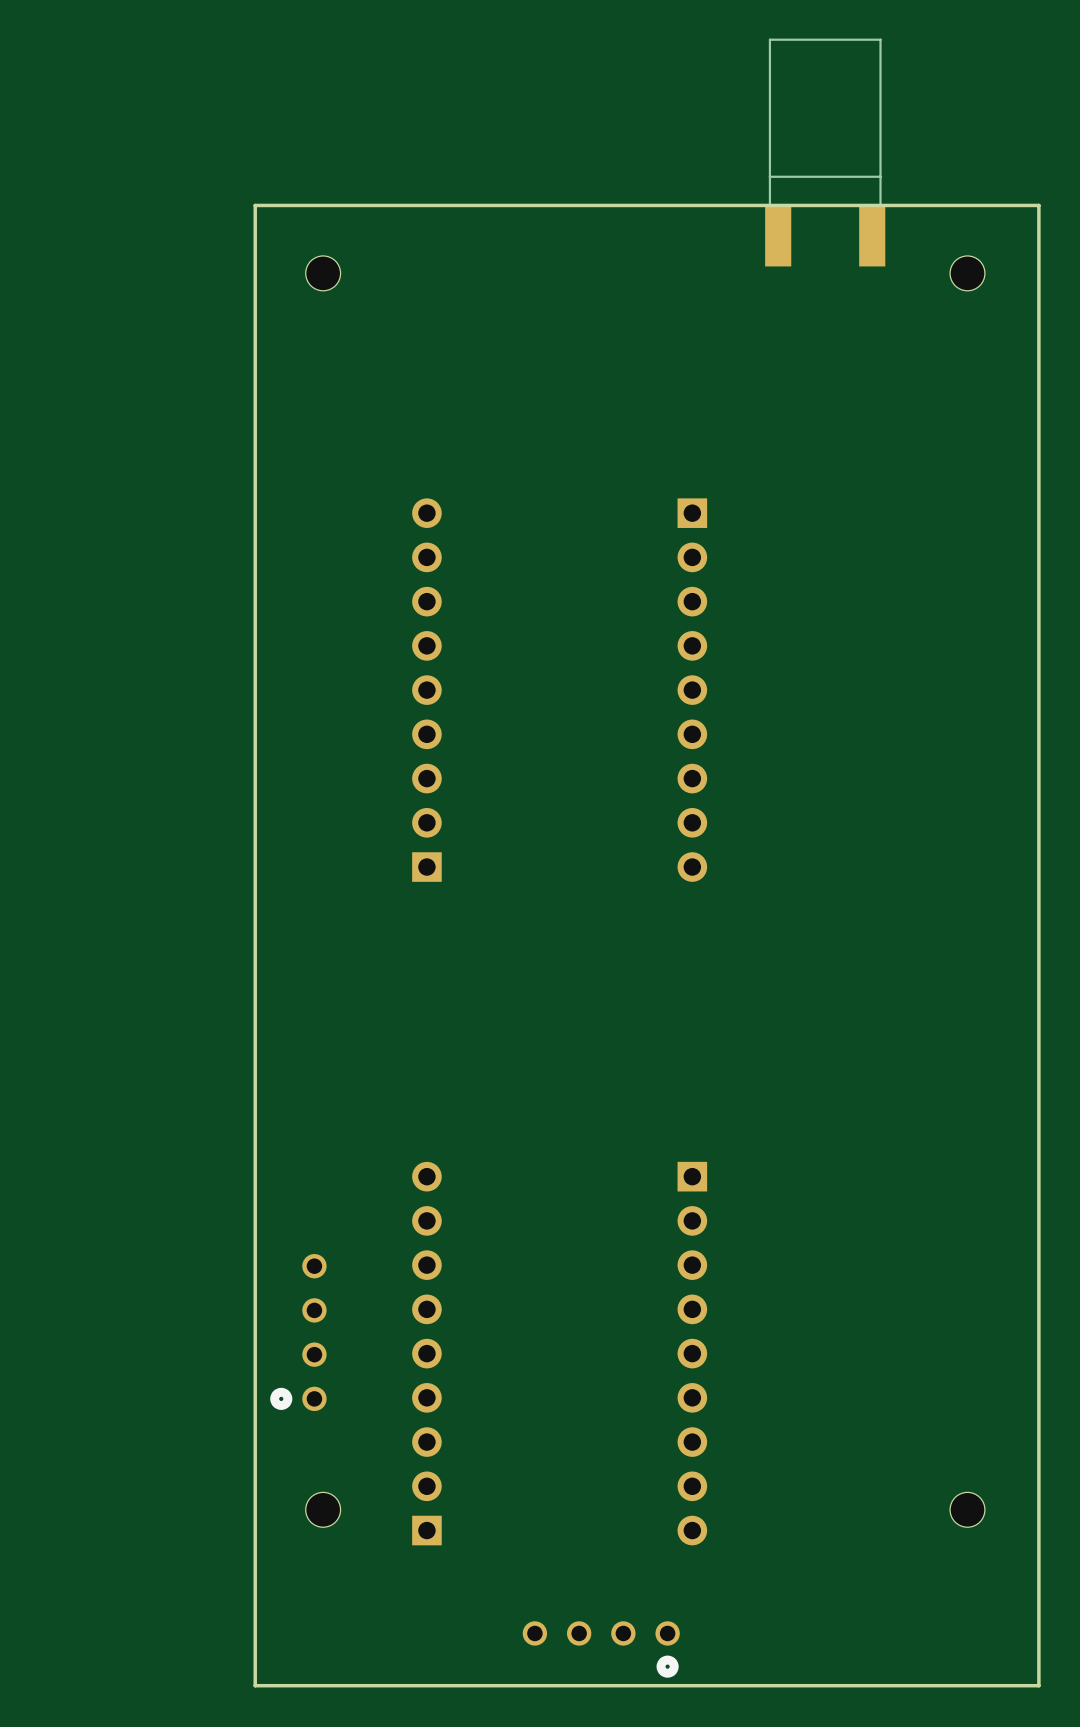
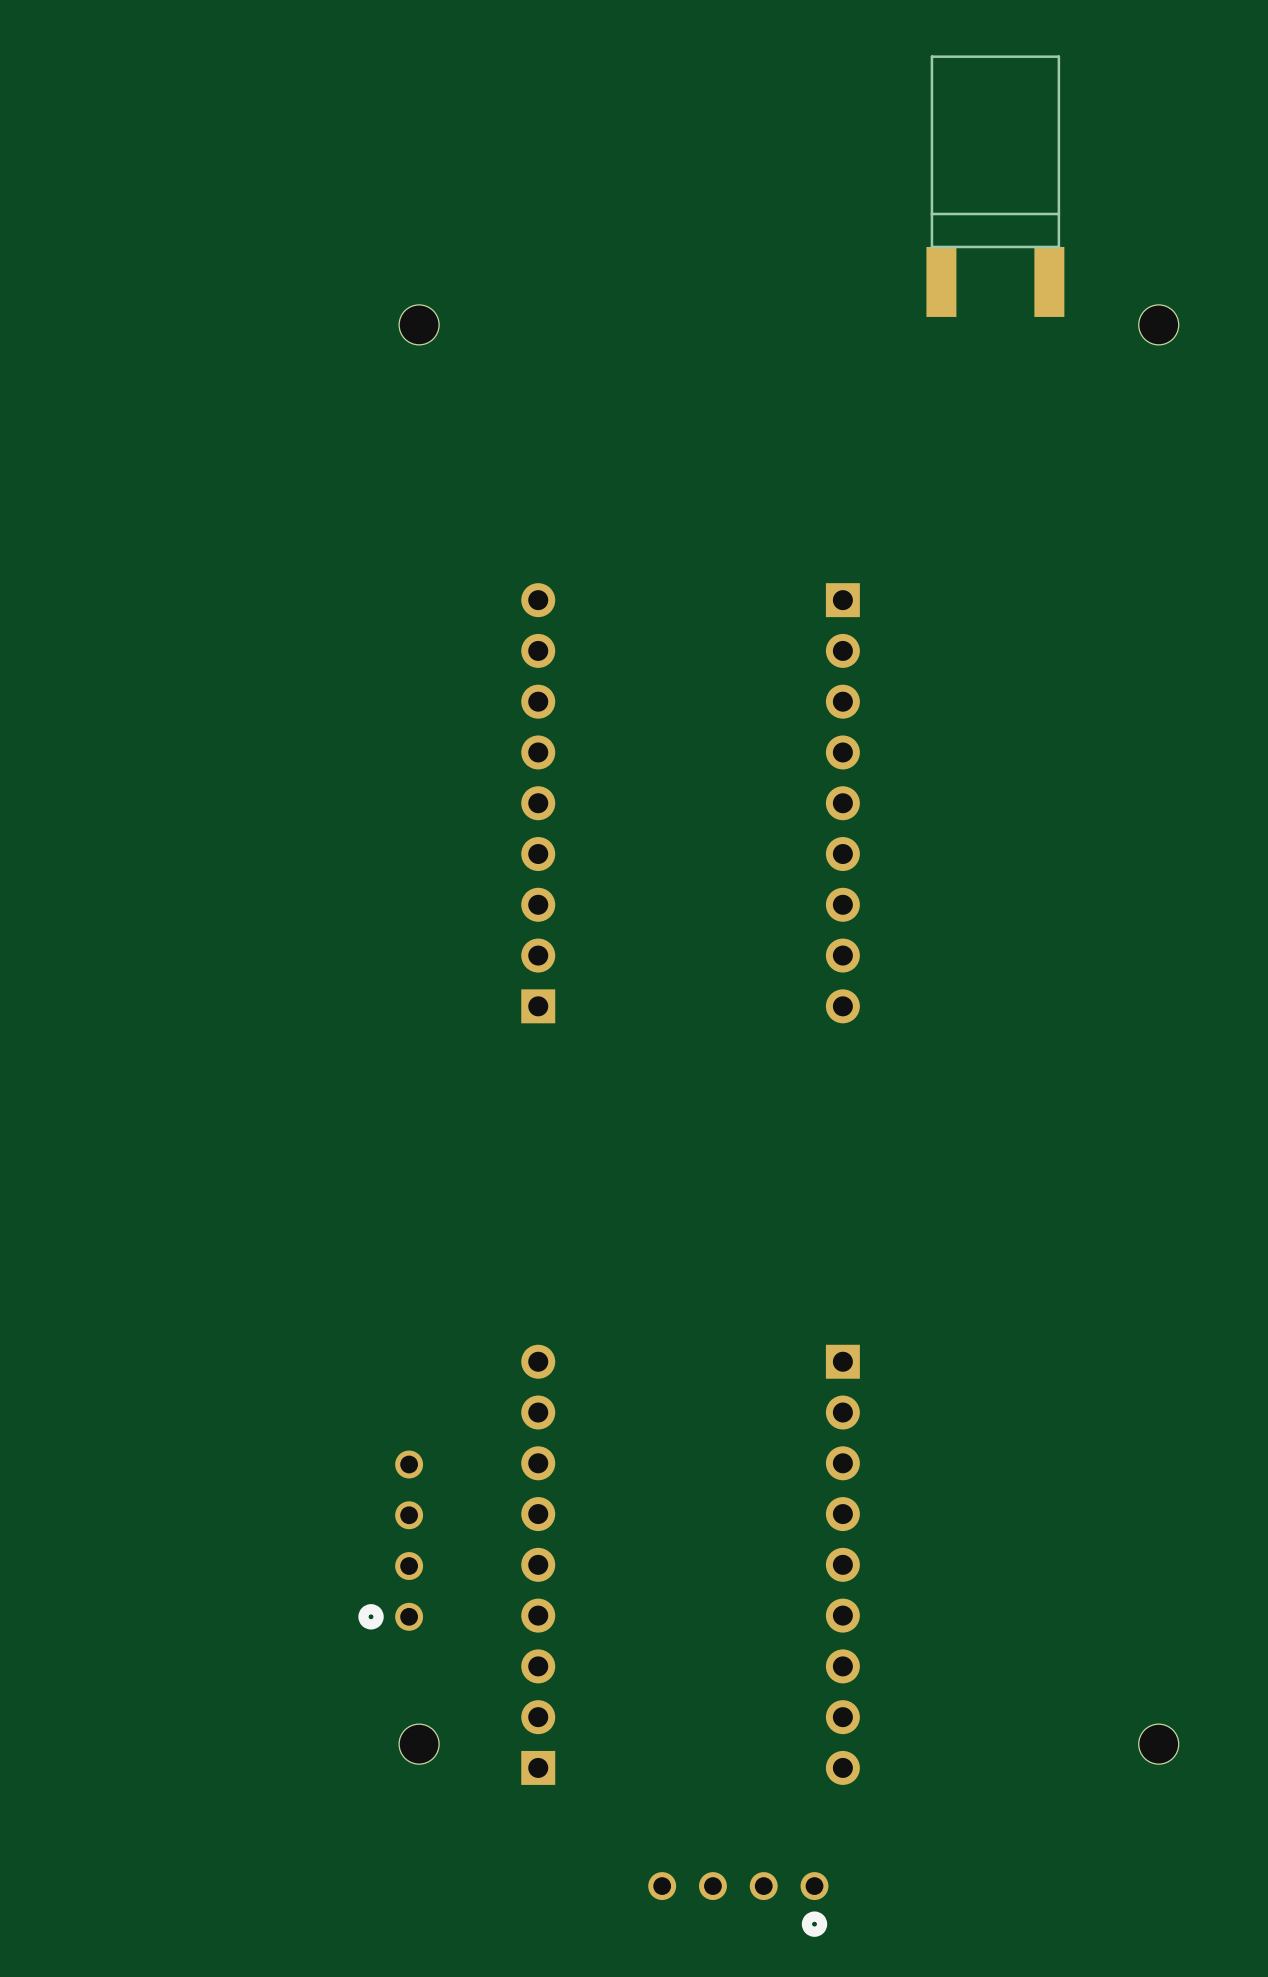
board edge: (1038, 205) (255, 205) (255, 1685) (1038, 1685) (1038, 205) -> none

